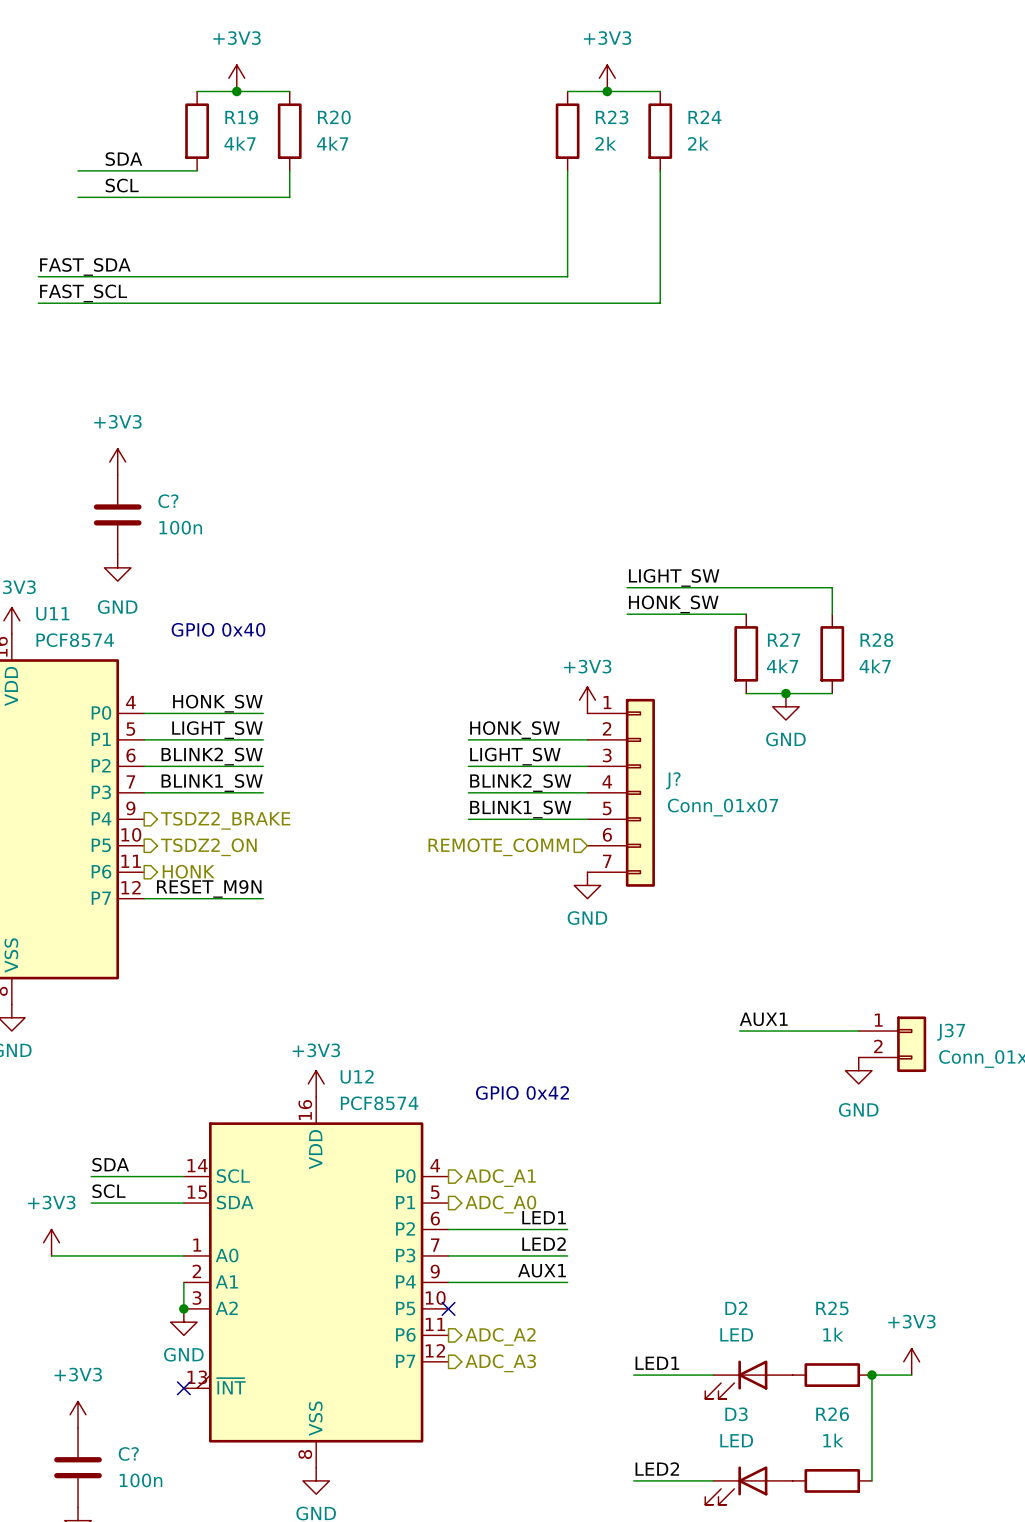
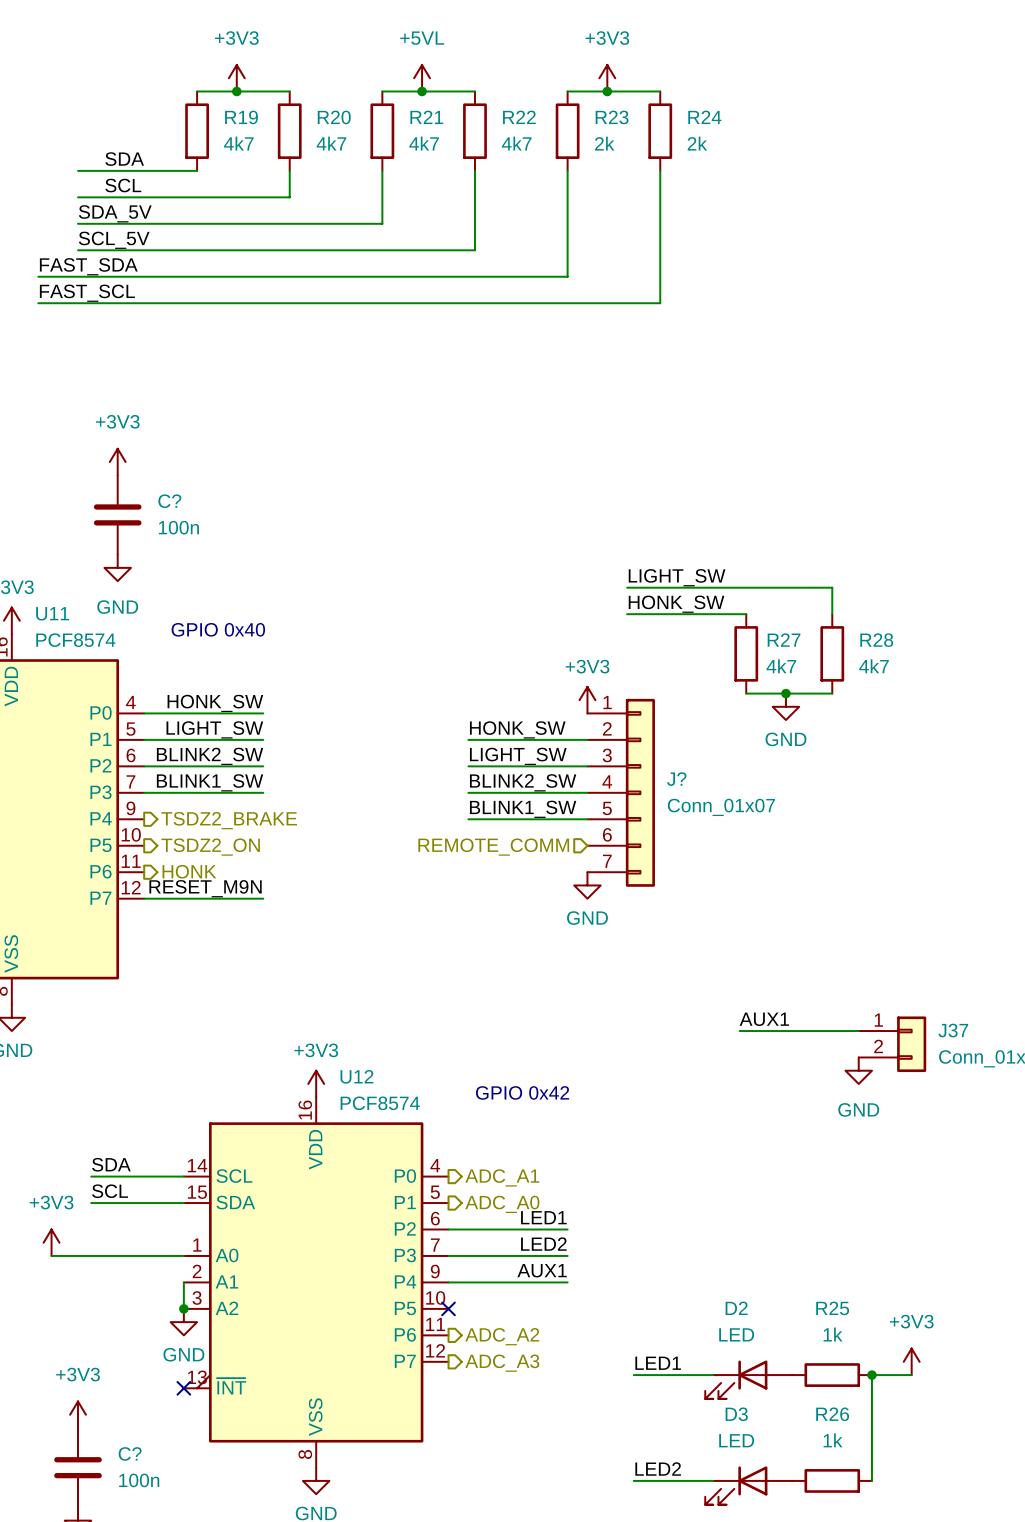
power symbol: none -> +5VL (422, 78)
wire: none -> (382, 91) (474, 91)
junction: none -> (422, 91)
R21: none -> 4k7 (382, 131)
R22: none -> 4k7 (474, 131)
wire: none -> (382, 170) (382, 223) (78, 223)
wire: none -> (474, 170) (474, 250) (78, 250)
label: none -> SDA_5V (115, 213)
label: none -> SCL_5V (114, 240)

